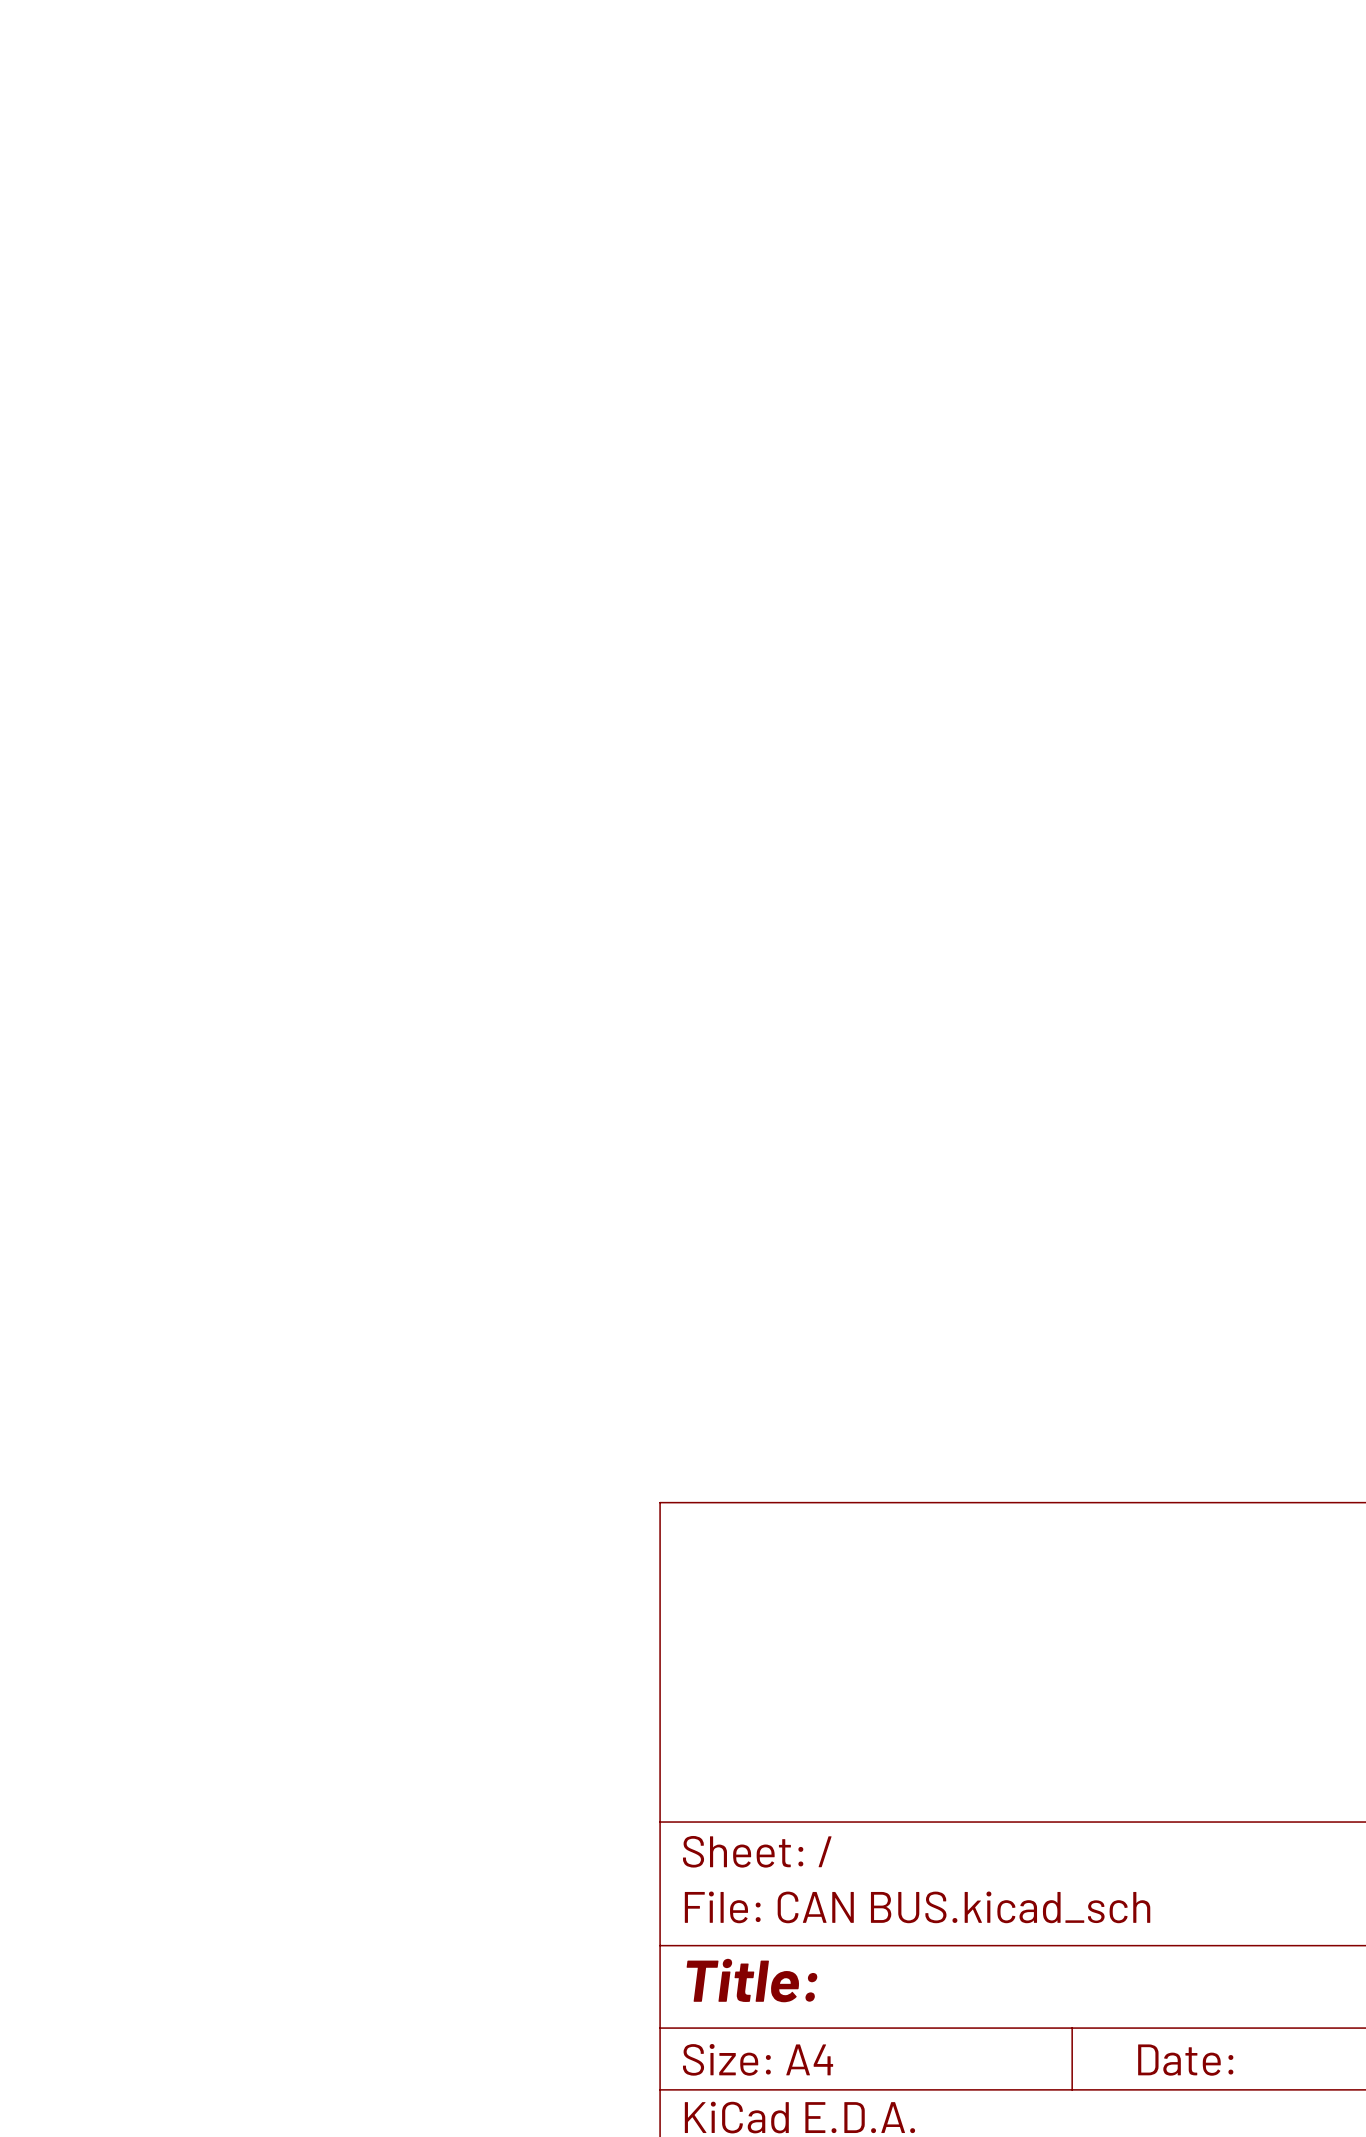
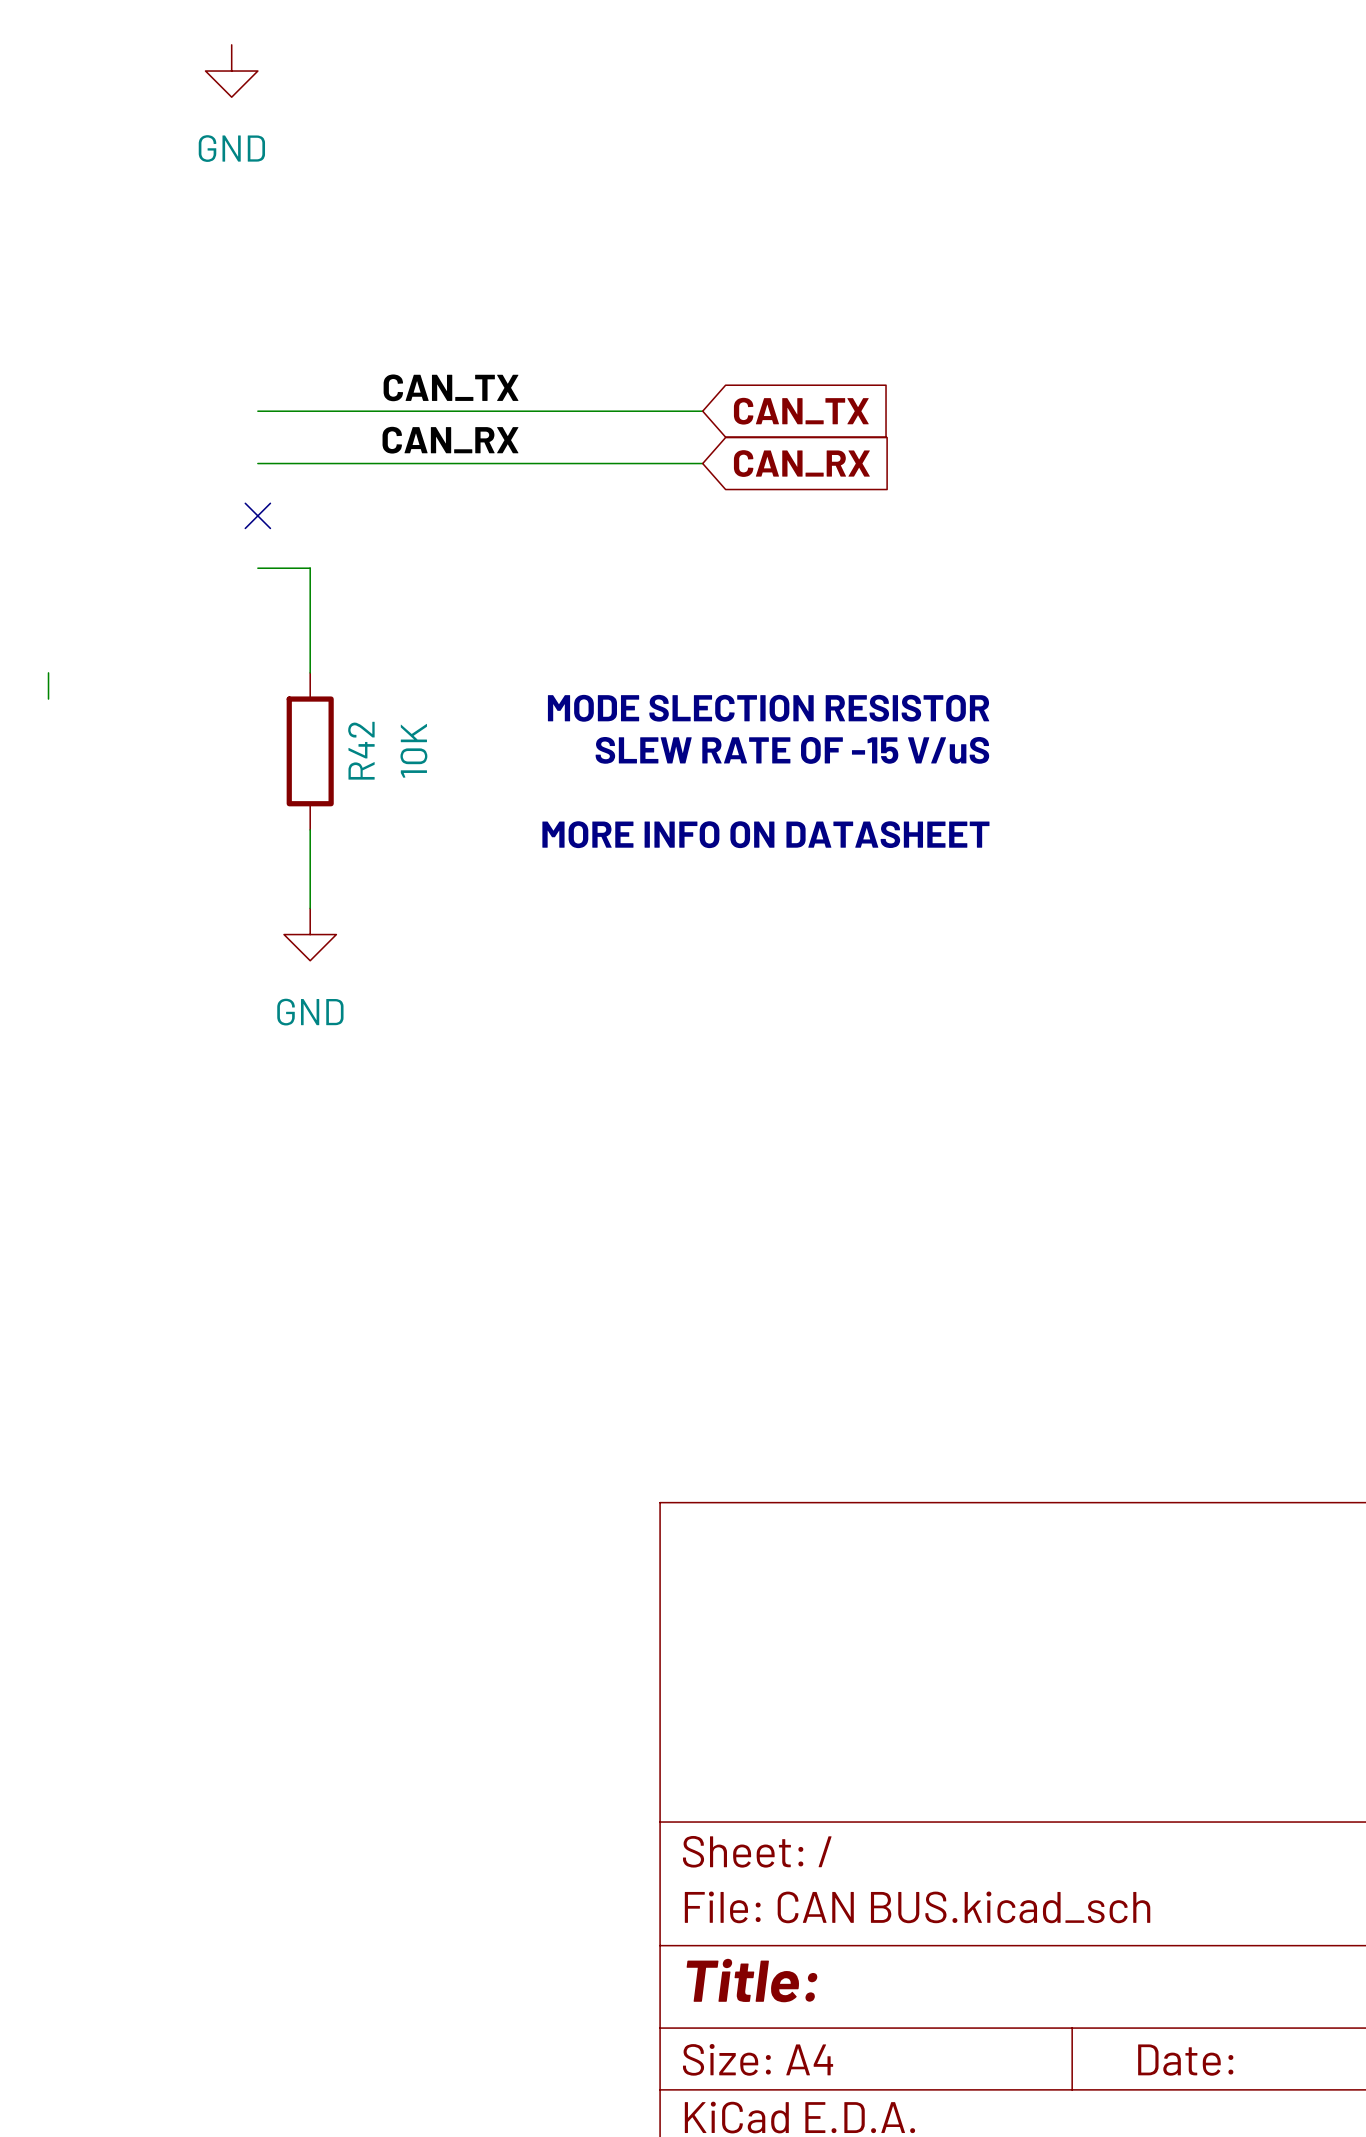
power symbol: none -> GND (231, 71)
label: none -> CAN_TX (451, 387)
wire: none -> (257, 411) (702, 411)
global label: none -> CAN_TX (801, 411)
label: none -> CAN_RX (450, 440)
wire: none -> (257, 463) (702, 463)
global label: none -> CAN_RX (801, 463)
no-connect mark: none -> (257, 515)
wire: none -> (257, 568) (310, 568) (310, 672)
wire: none -> (48, 672) (48, 699)
text: none -> MODE SLECTION RESISTOR (768, 708)
text: none -> SLEW RATE OF -15 V/uS (792, 750)
R42: none -> 10K (310, 751)
wire: none -> (310, 829) (310, 908)
text: none -> MORE INFO ON DATASHEET (765, 834)
power symbol: none -> GND (310, 934)

